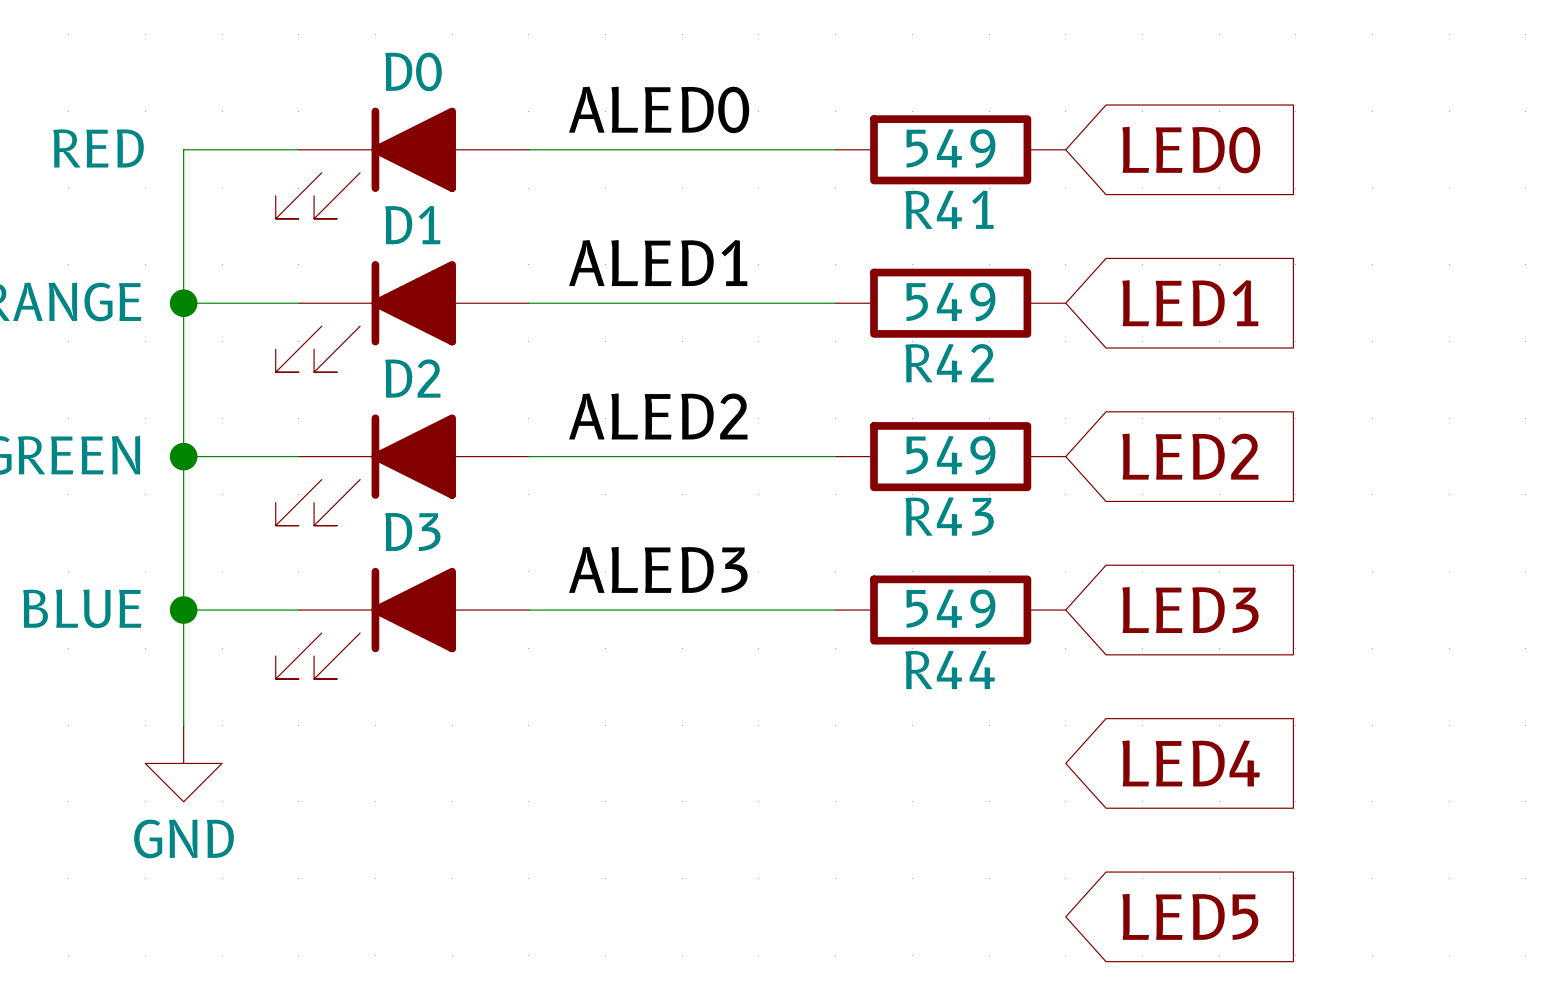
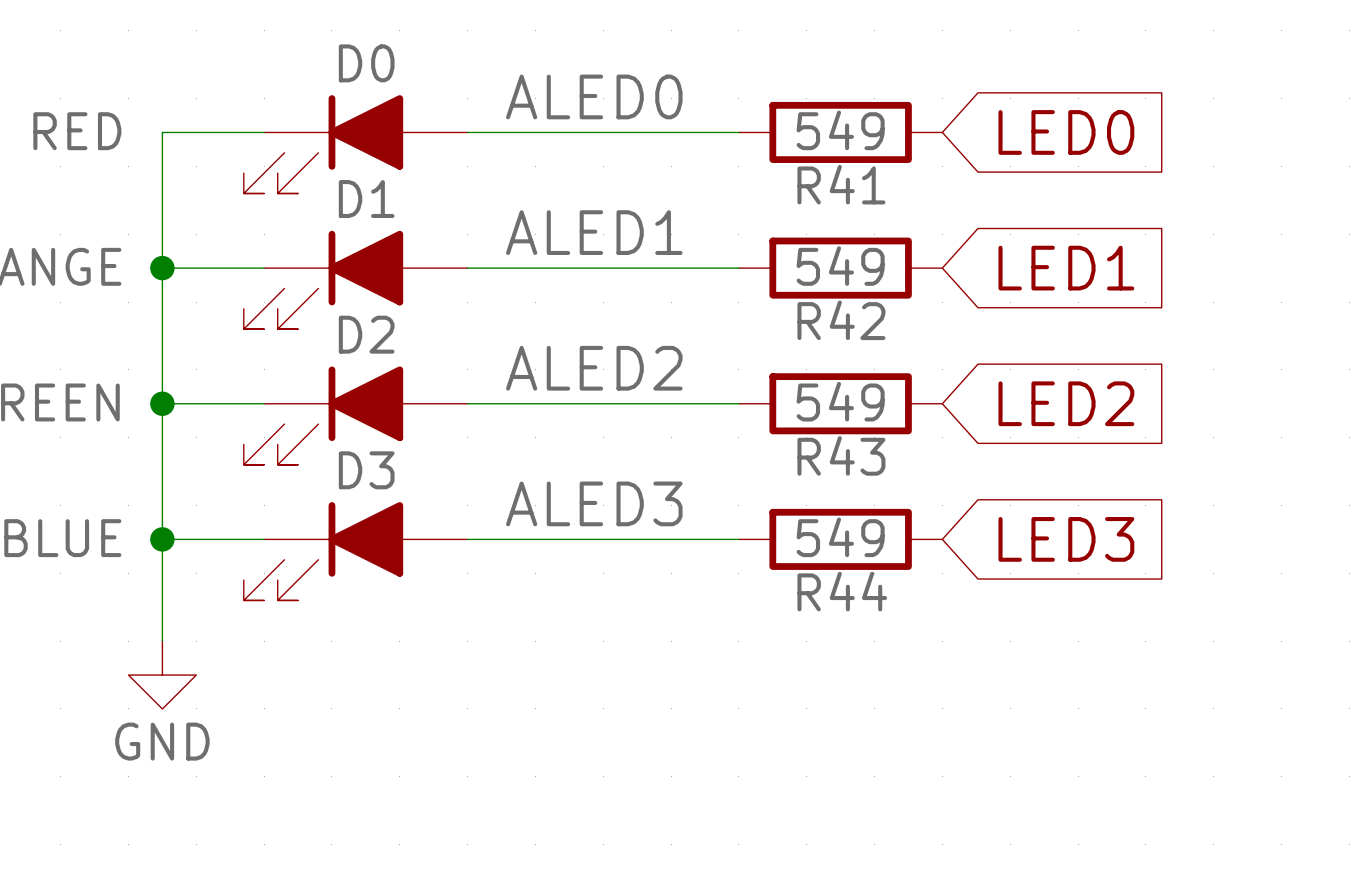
global label: LED4 (1191, 763) -> none
global label: LED5 (1190, 916) -> none

